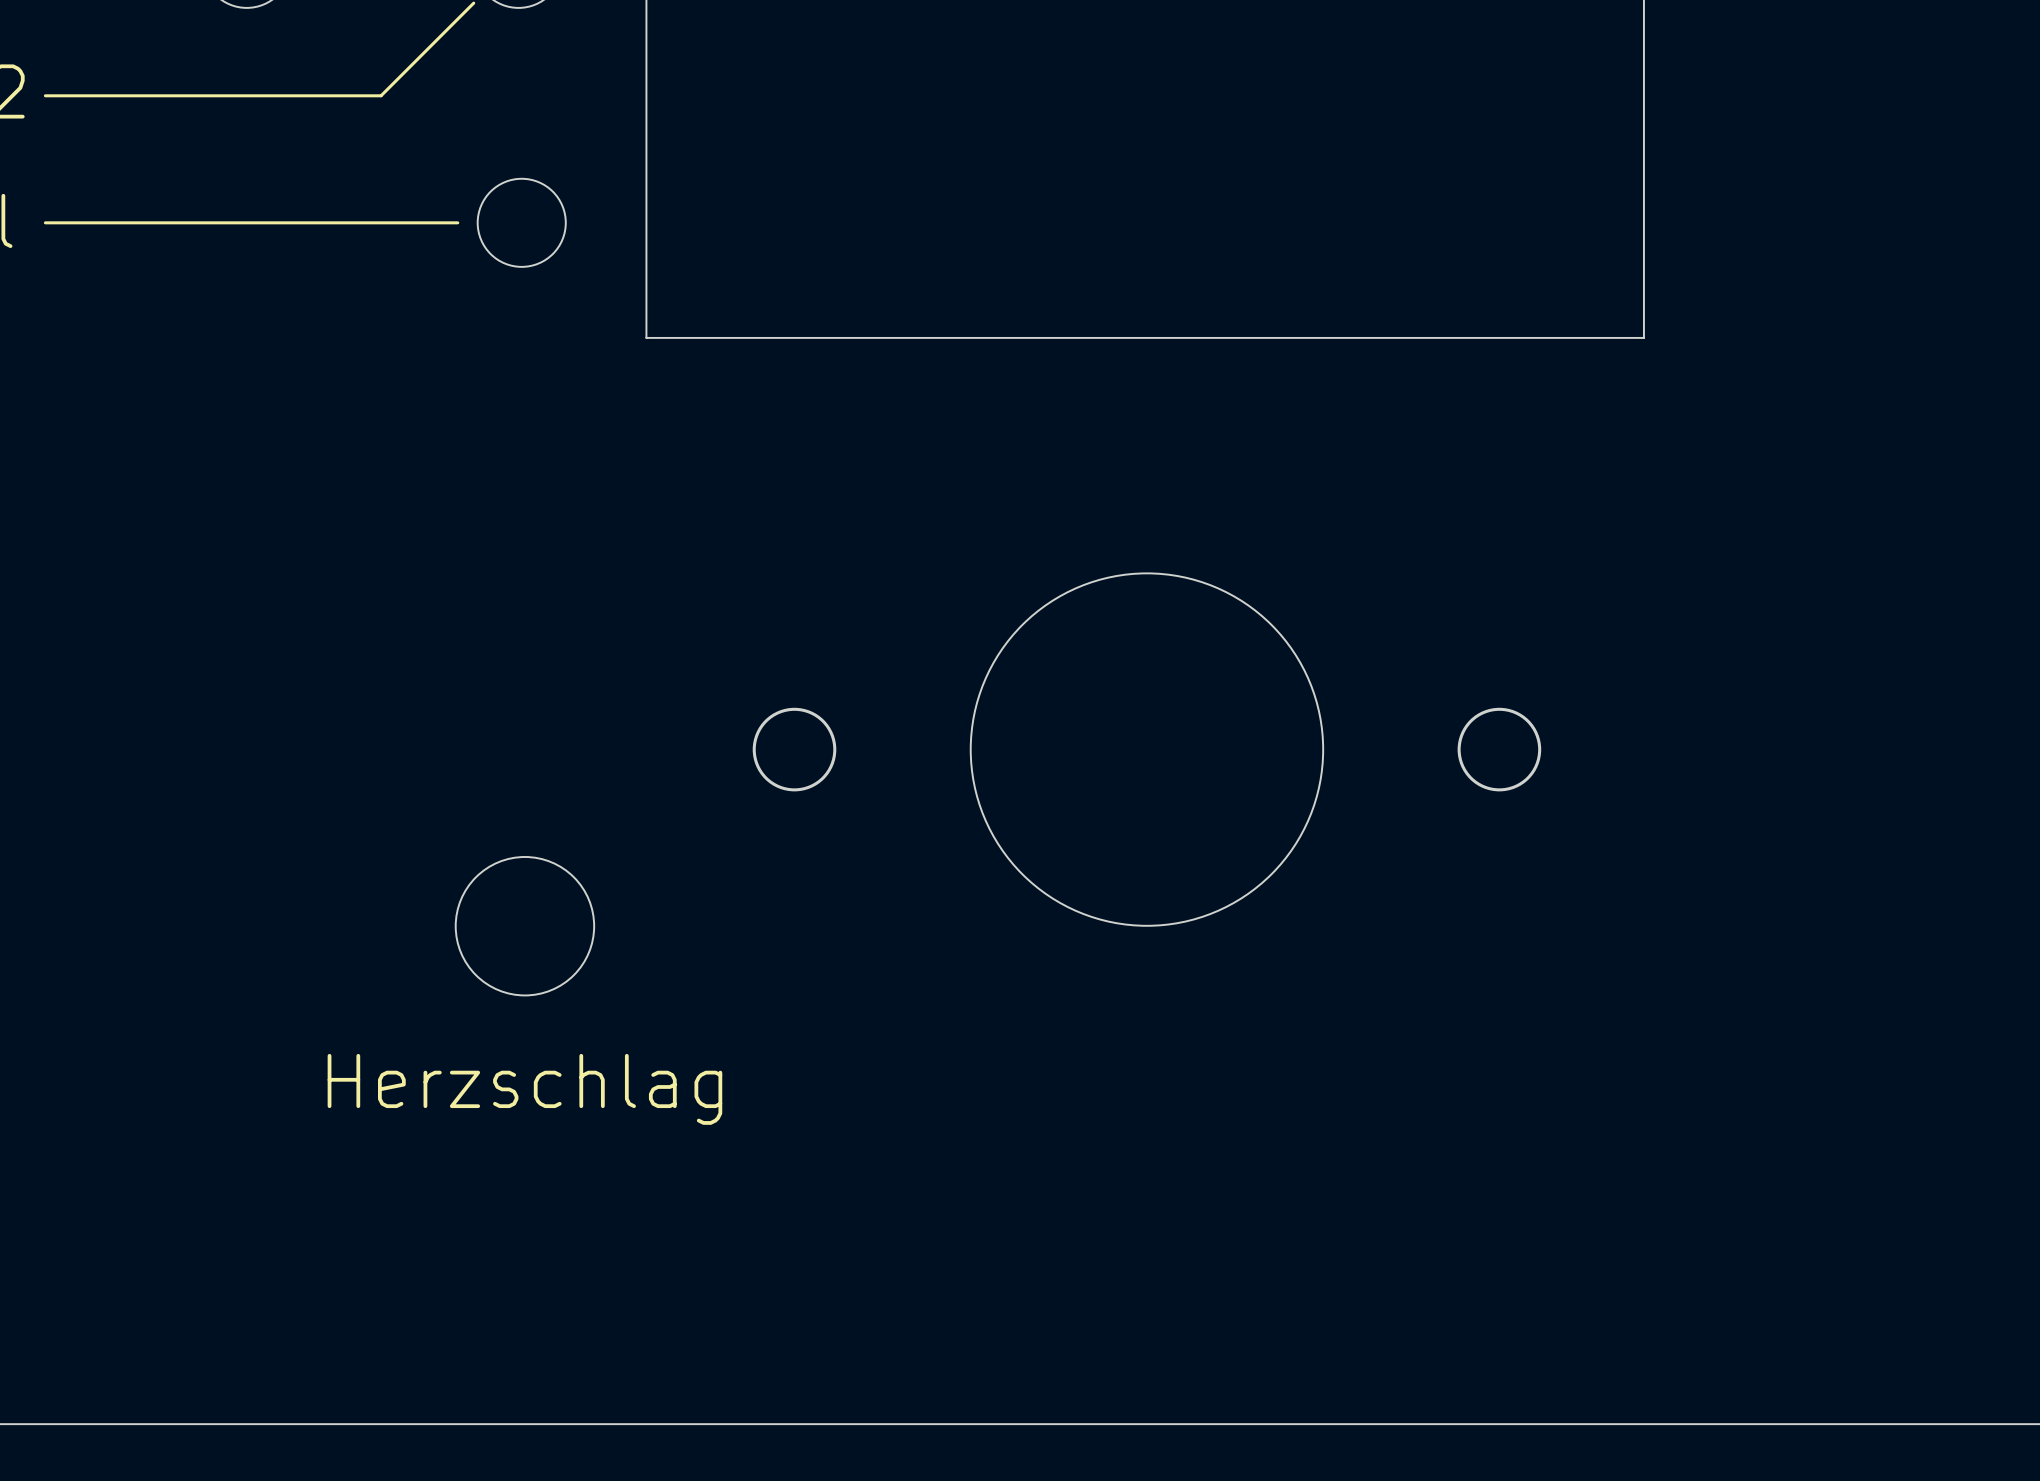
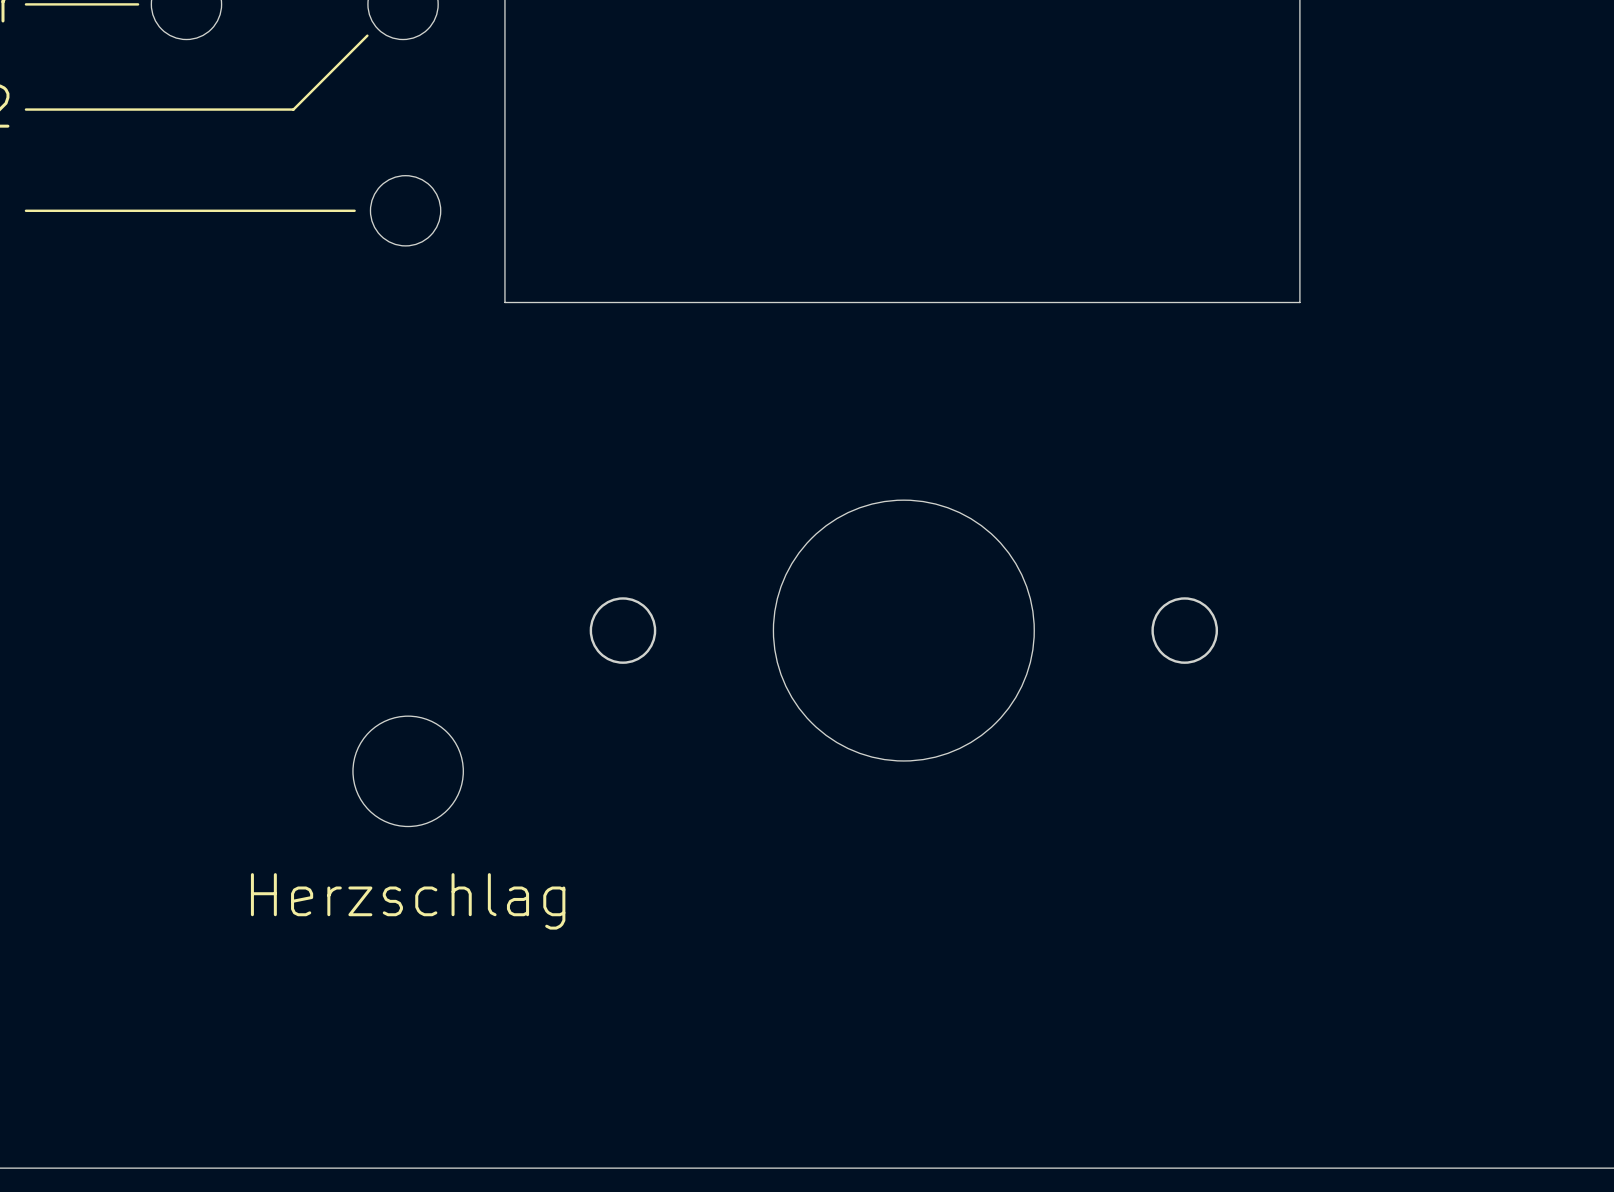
round board edge size: [970, 572, 1324, 927] -> [772, 499, 1035, 762]

